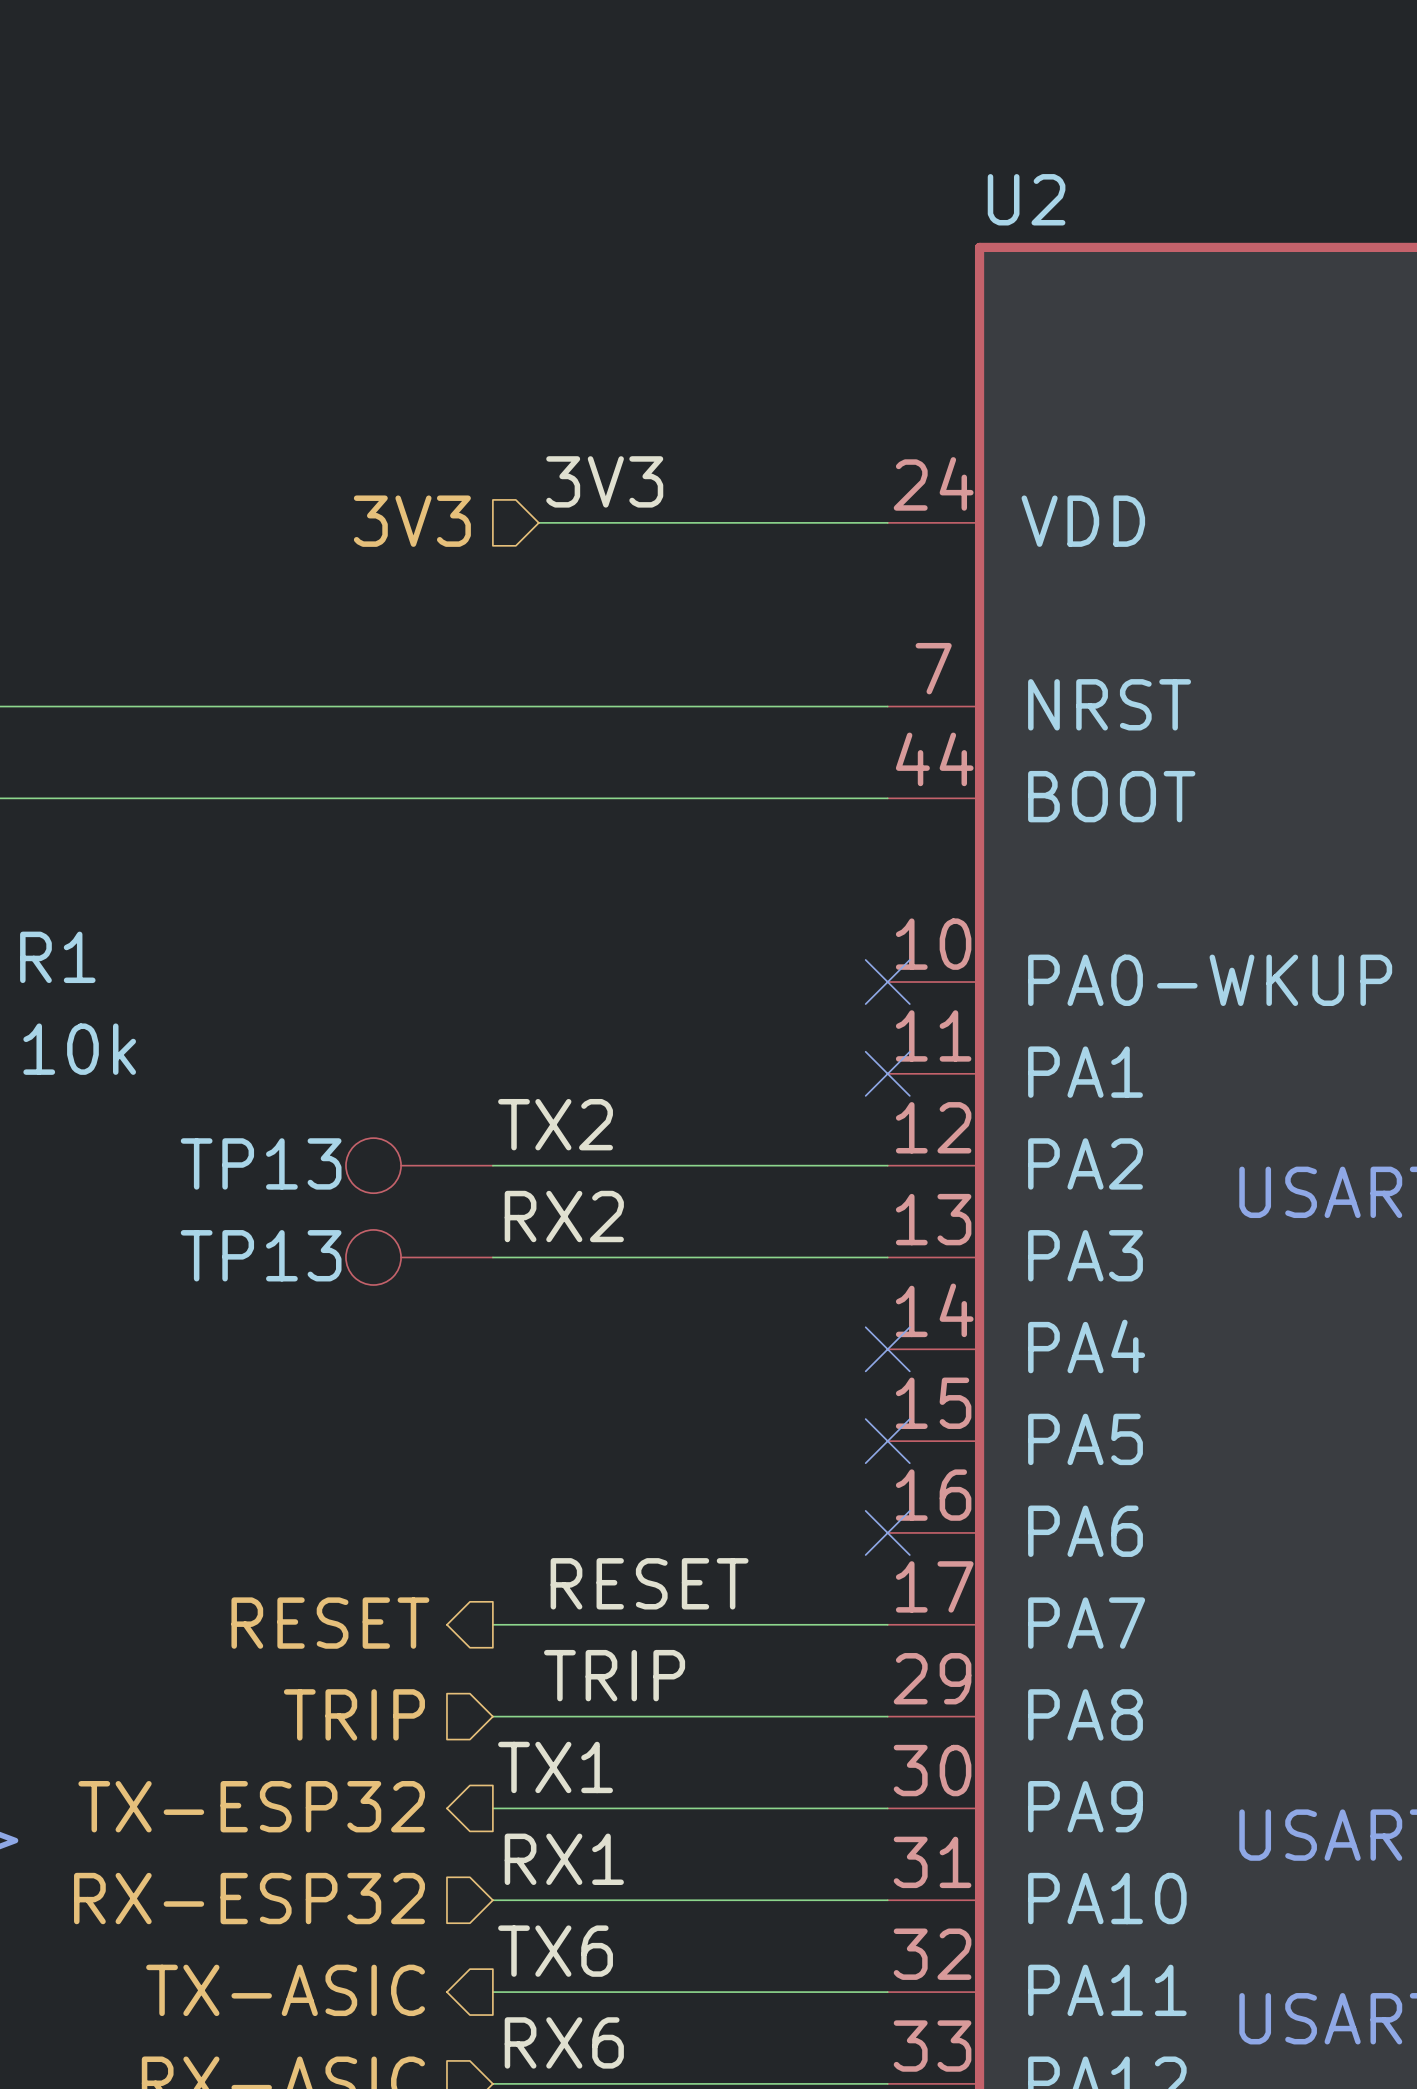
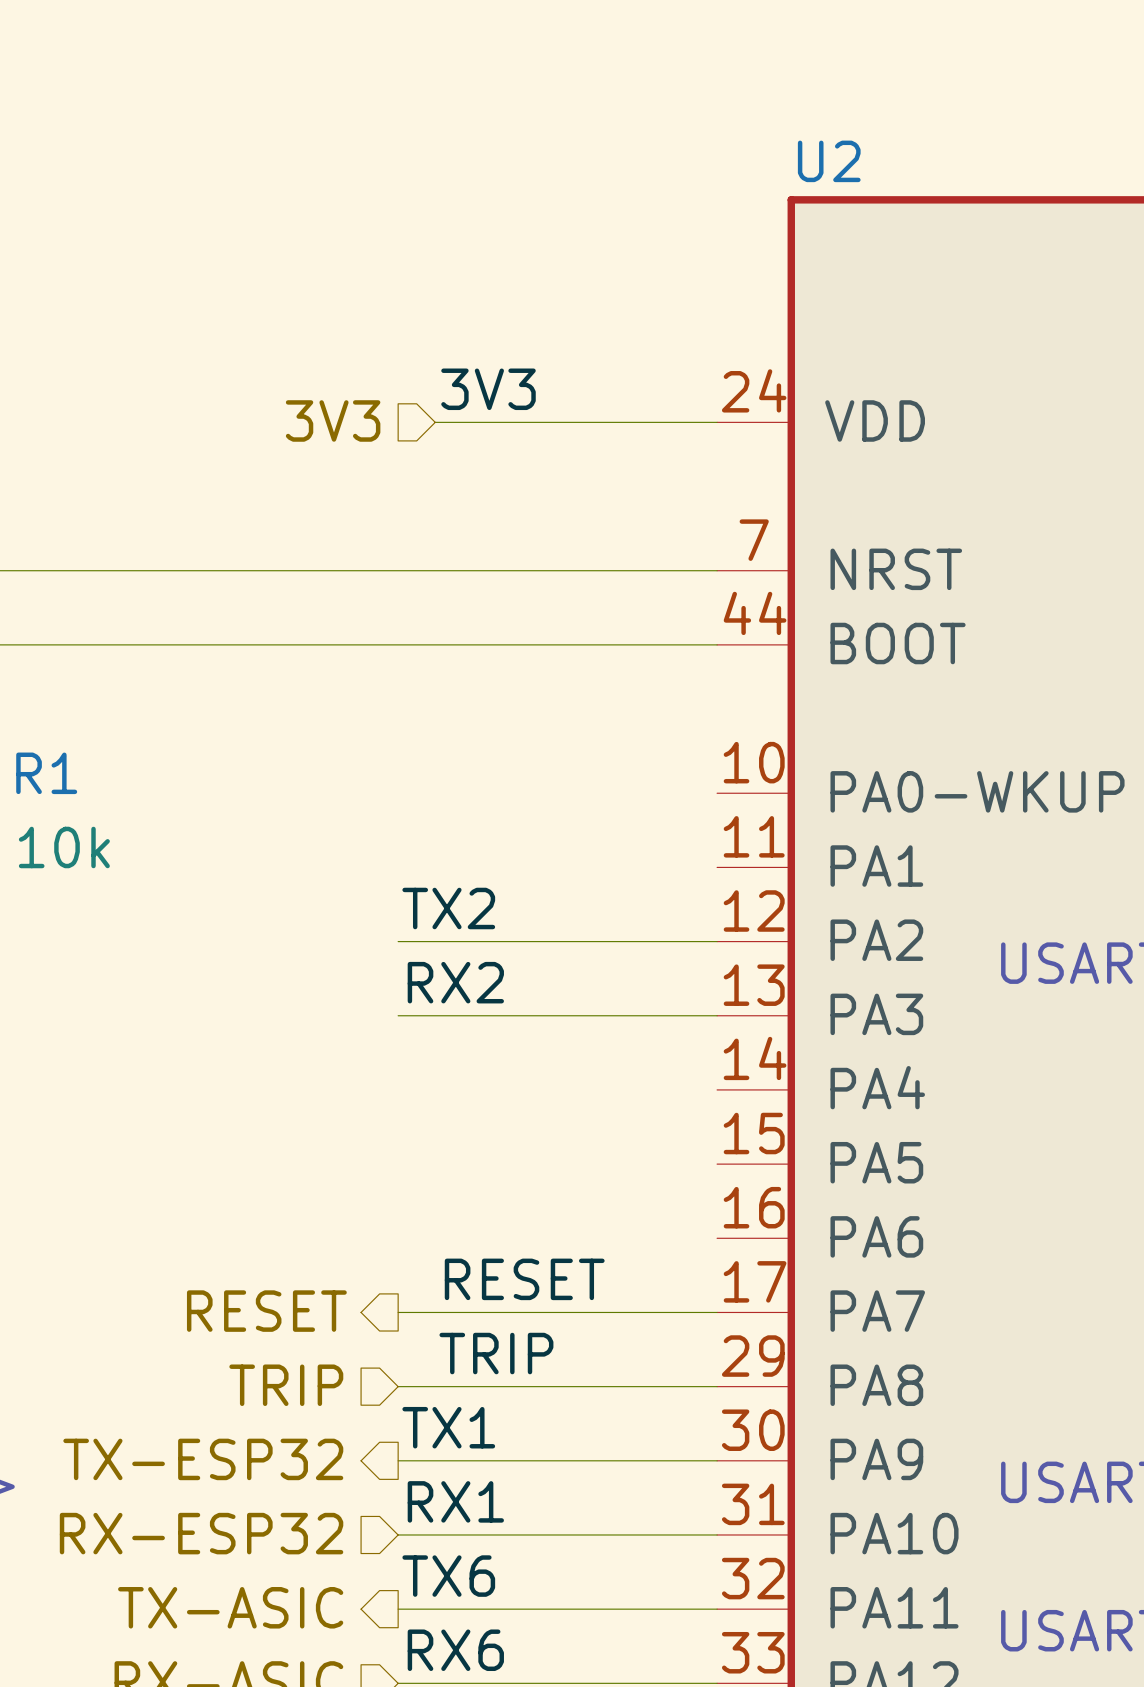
no-connect mark: (887, 982) -> none
no-connect mark: (887, 1073) -> none
TP13: (419, 1165) -> none
TP13: (419, 1257) -> none
no-connect mark: (887, 1349) -> none
no-connect mark: (887, 1441) -> none
no-connect mark: (887, 1532) -> none

